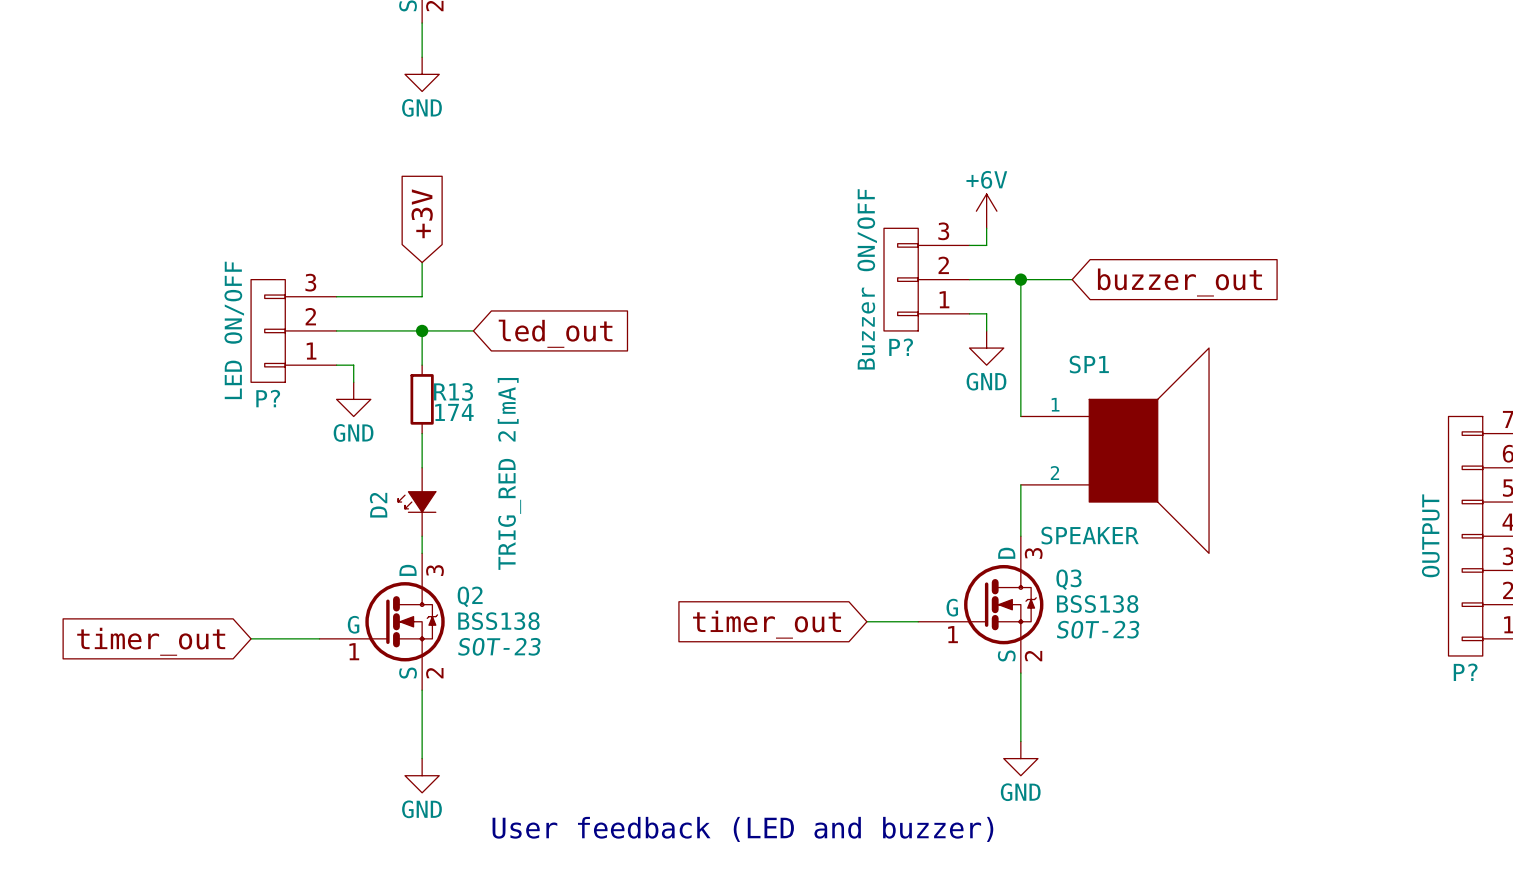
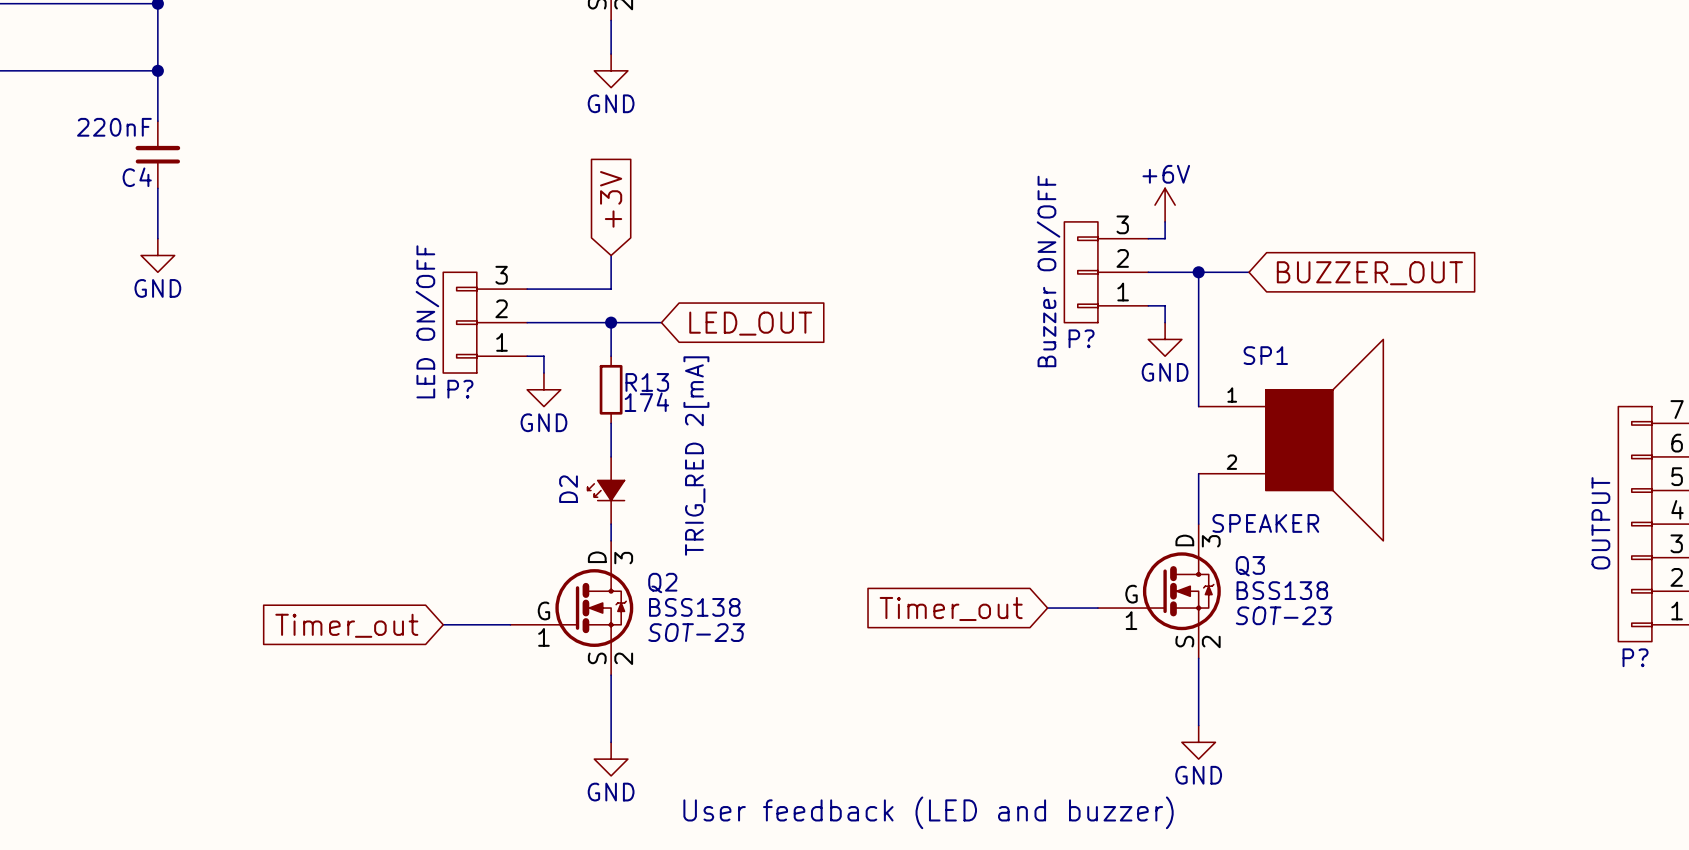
global label: buzzer_out (1179, 282) -> BUZZER_OUT (1369, 273)
global label: led_out (555, 333) -> LED_OUT (750, 323)
global label: timer_out (767, 624) -> Timer_out (951, 608)
global label: timer_out (151, 641) -> Timer_out (346, 625)

